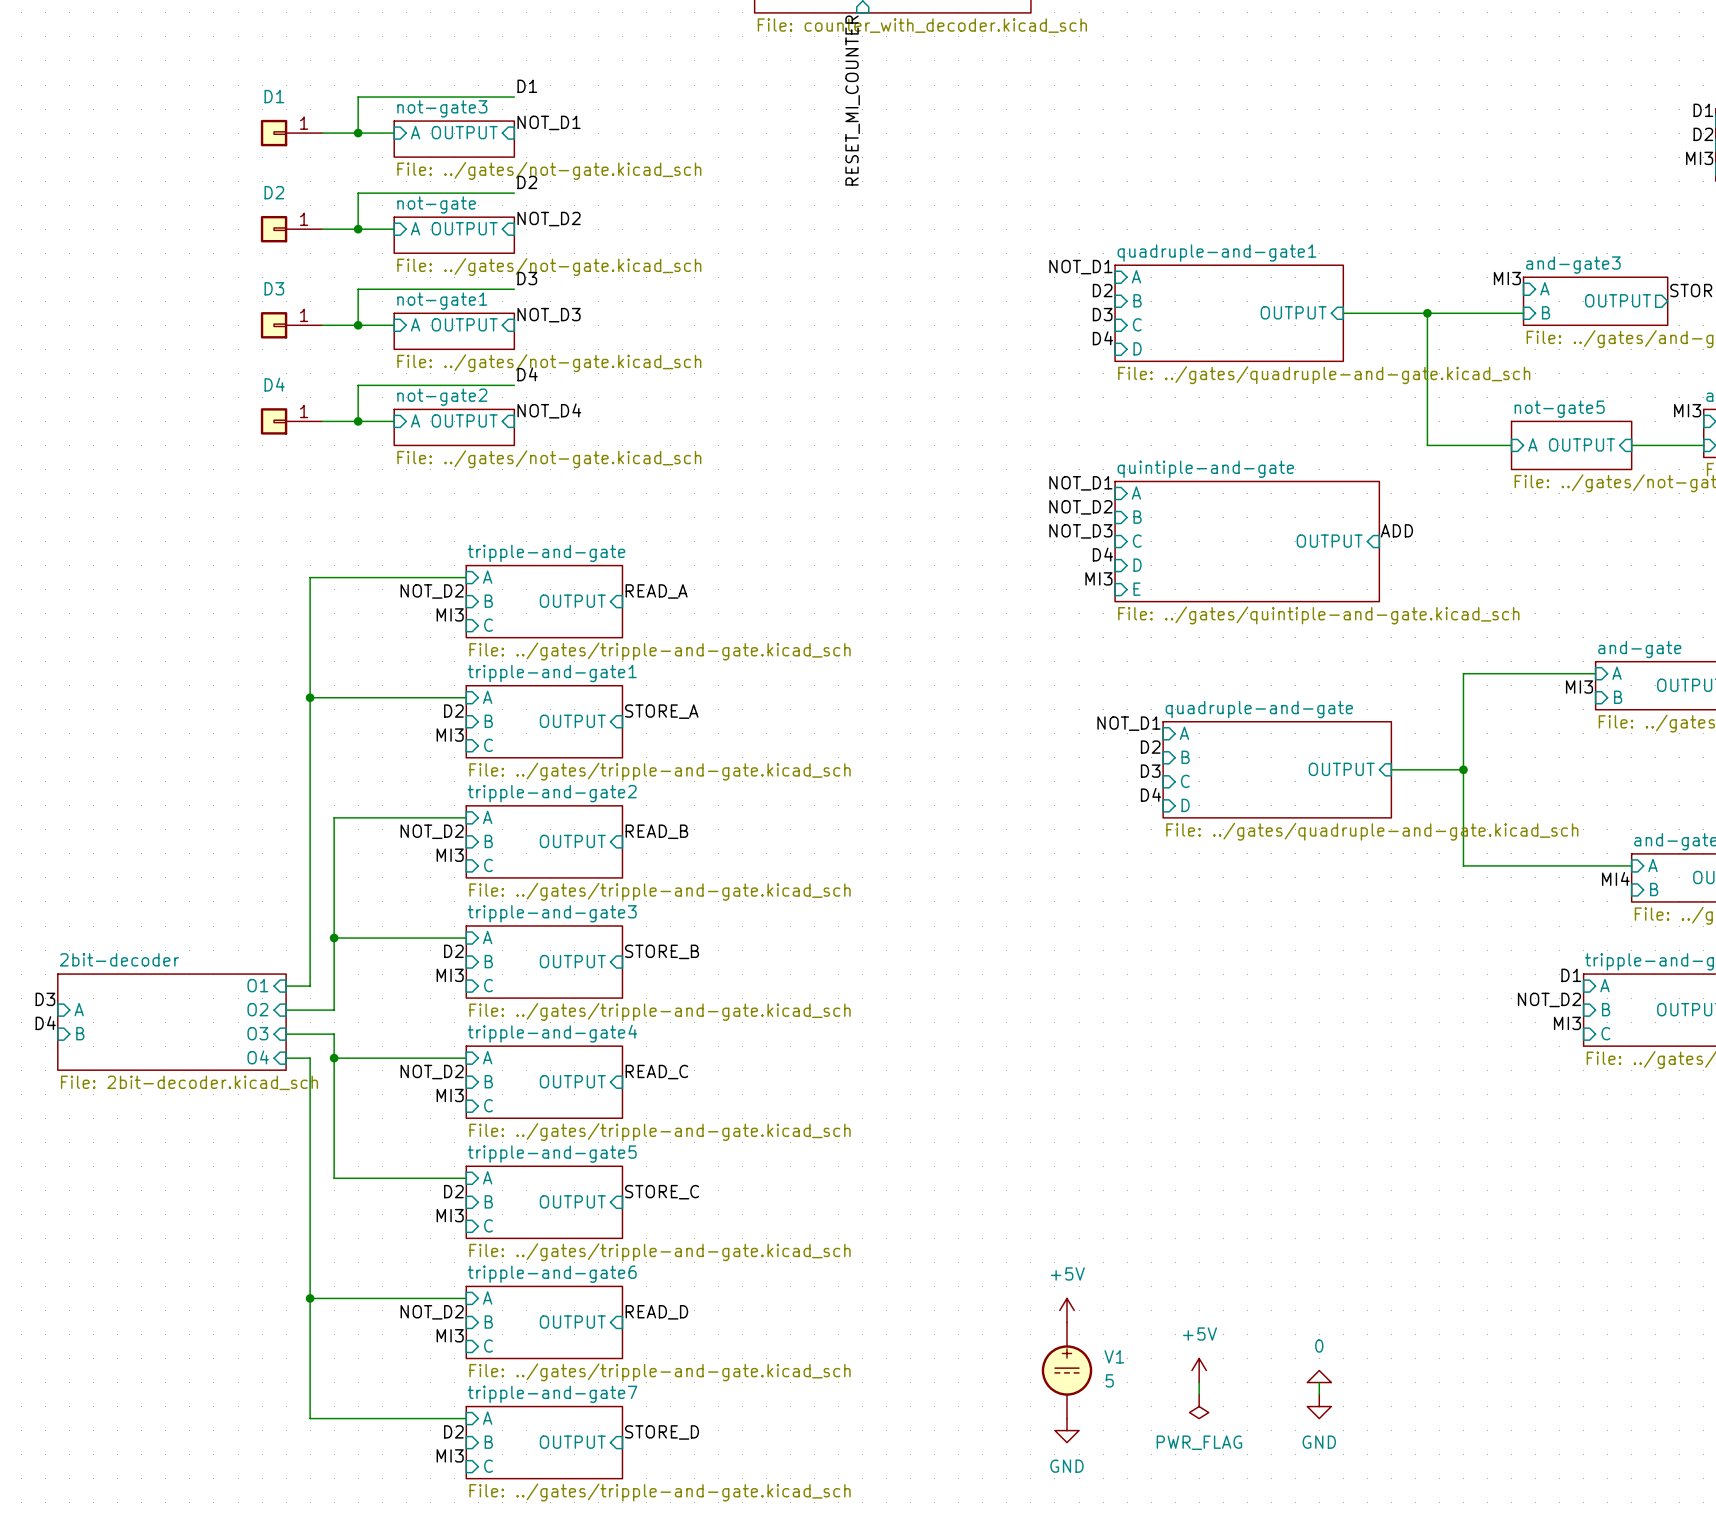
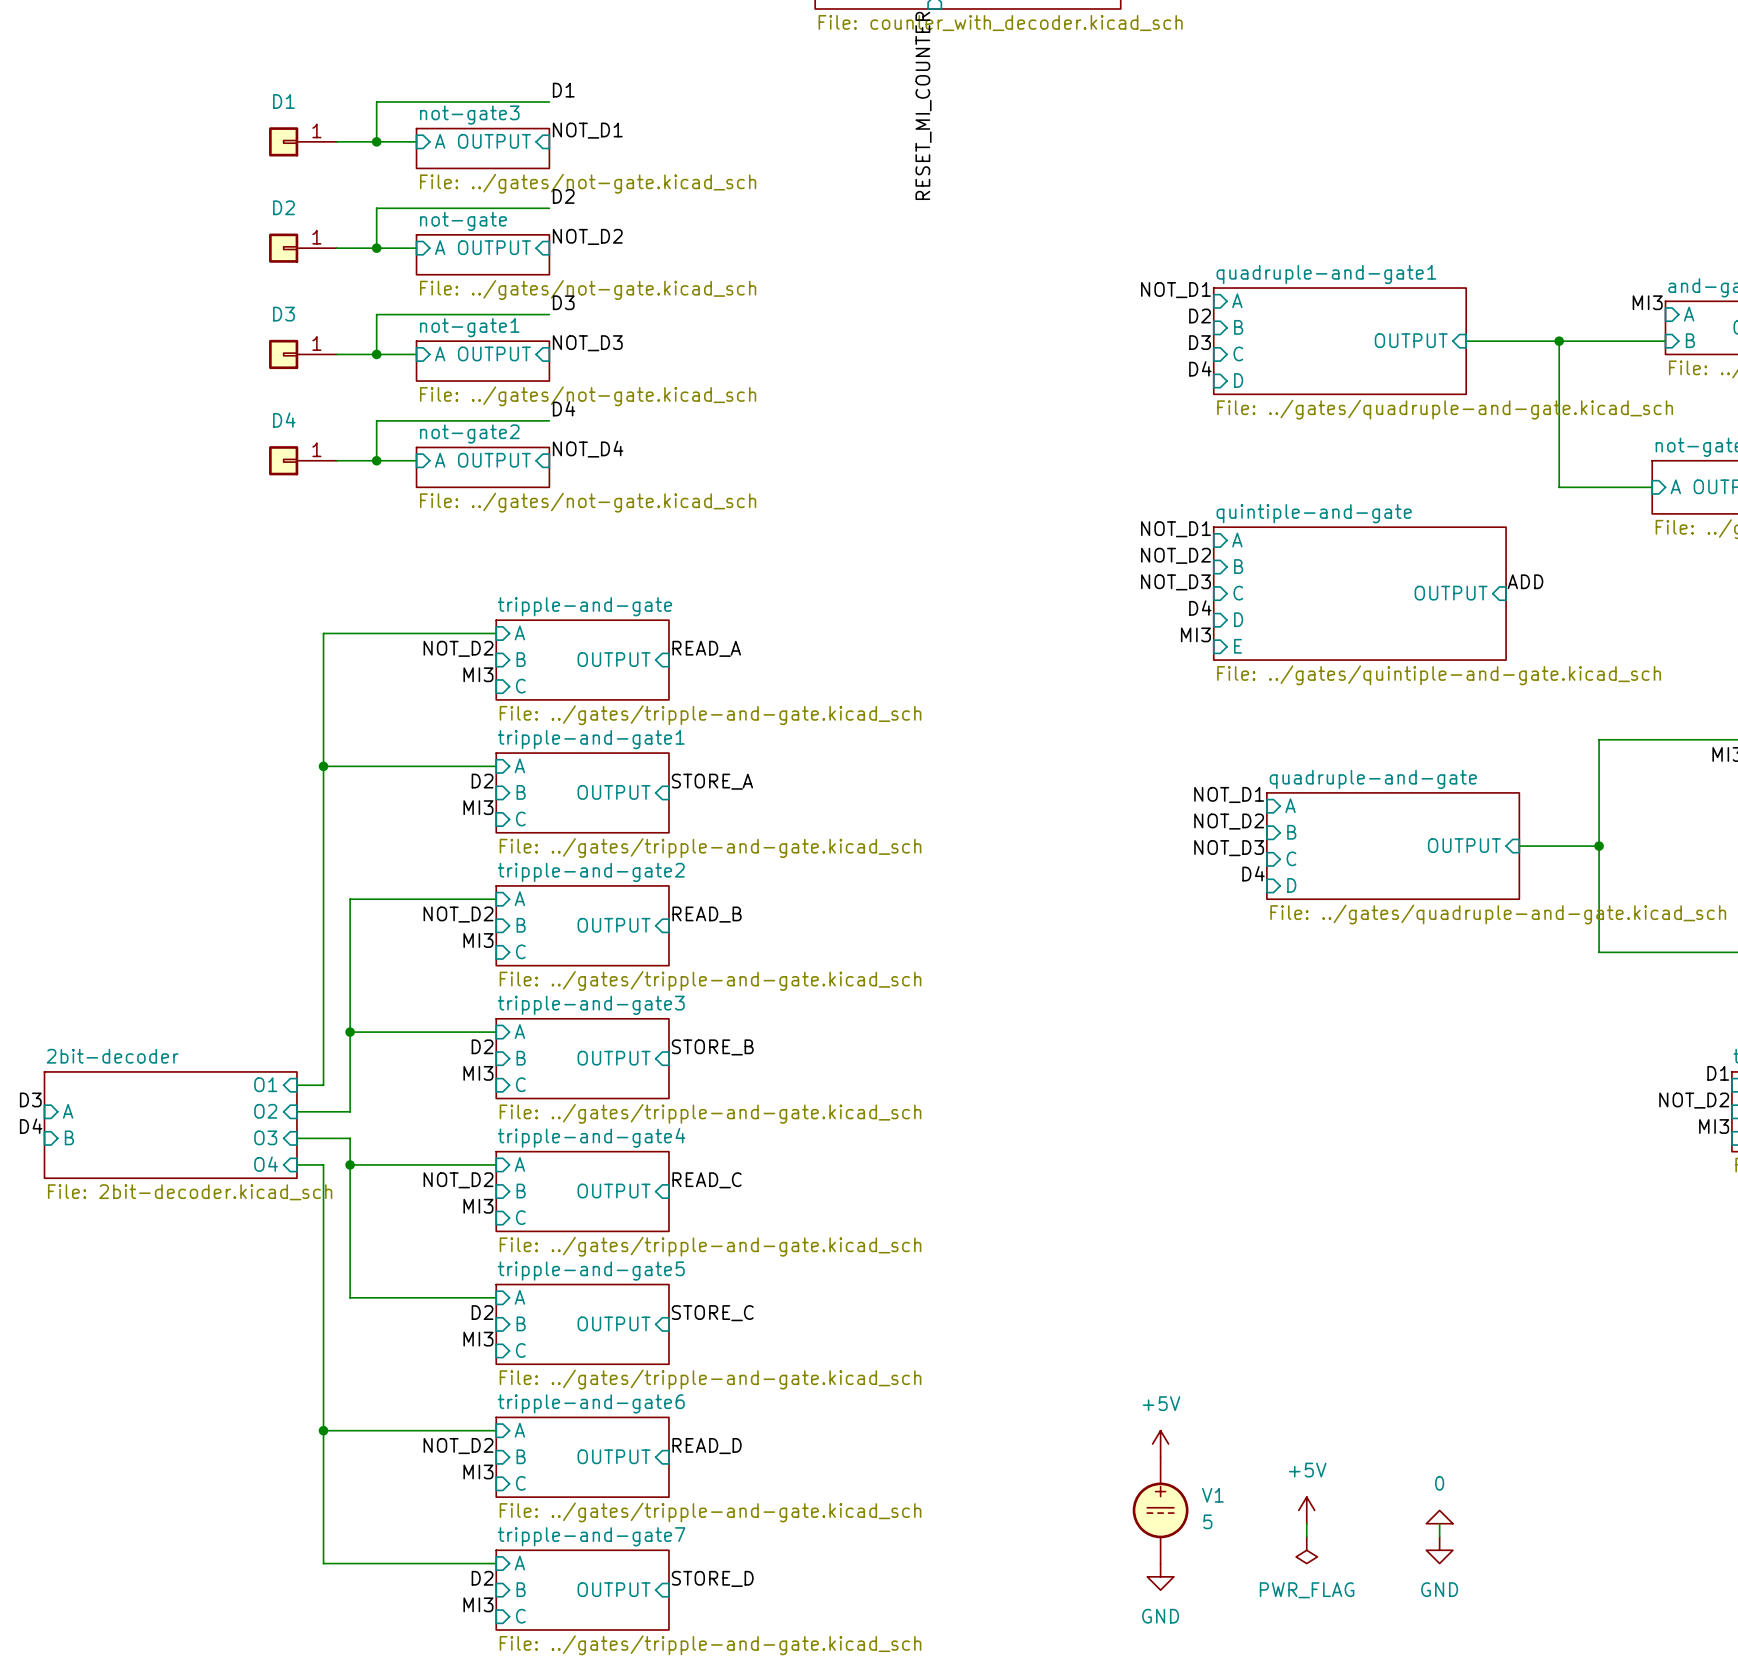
label: D2 (1150, 747) -> NOT_D2 (1229, 821)
label: D3 (1150, 771) -> NOT_D3 (1229, 848)

